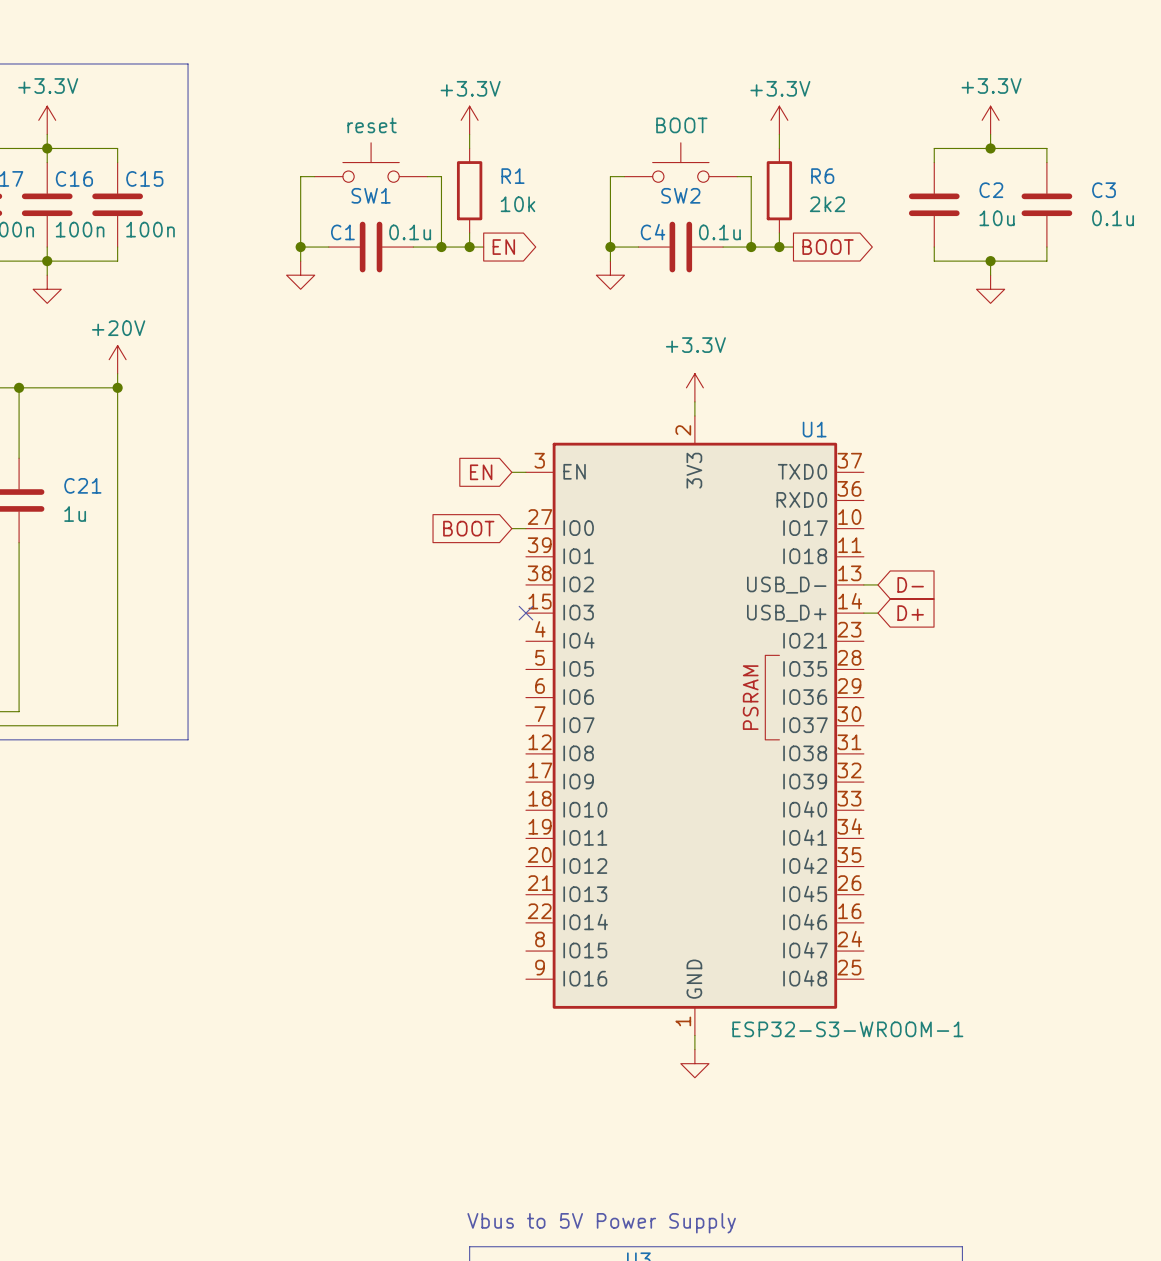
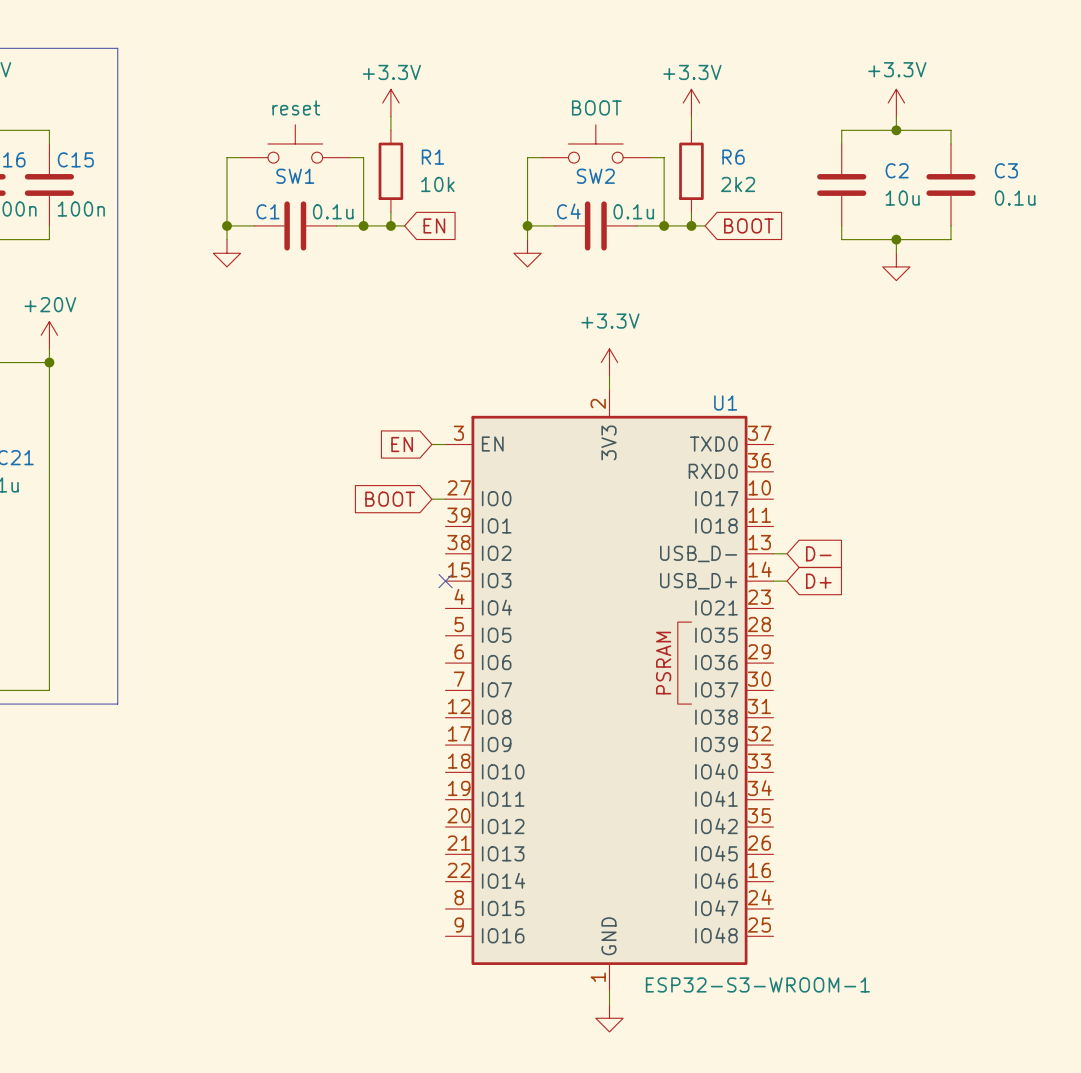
global label shape: output (503, 247) -> input (434, 225)
global label shape: output (828, 247) -> input (748, 225)

